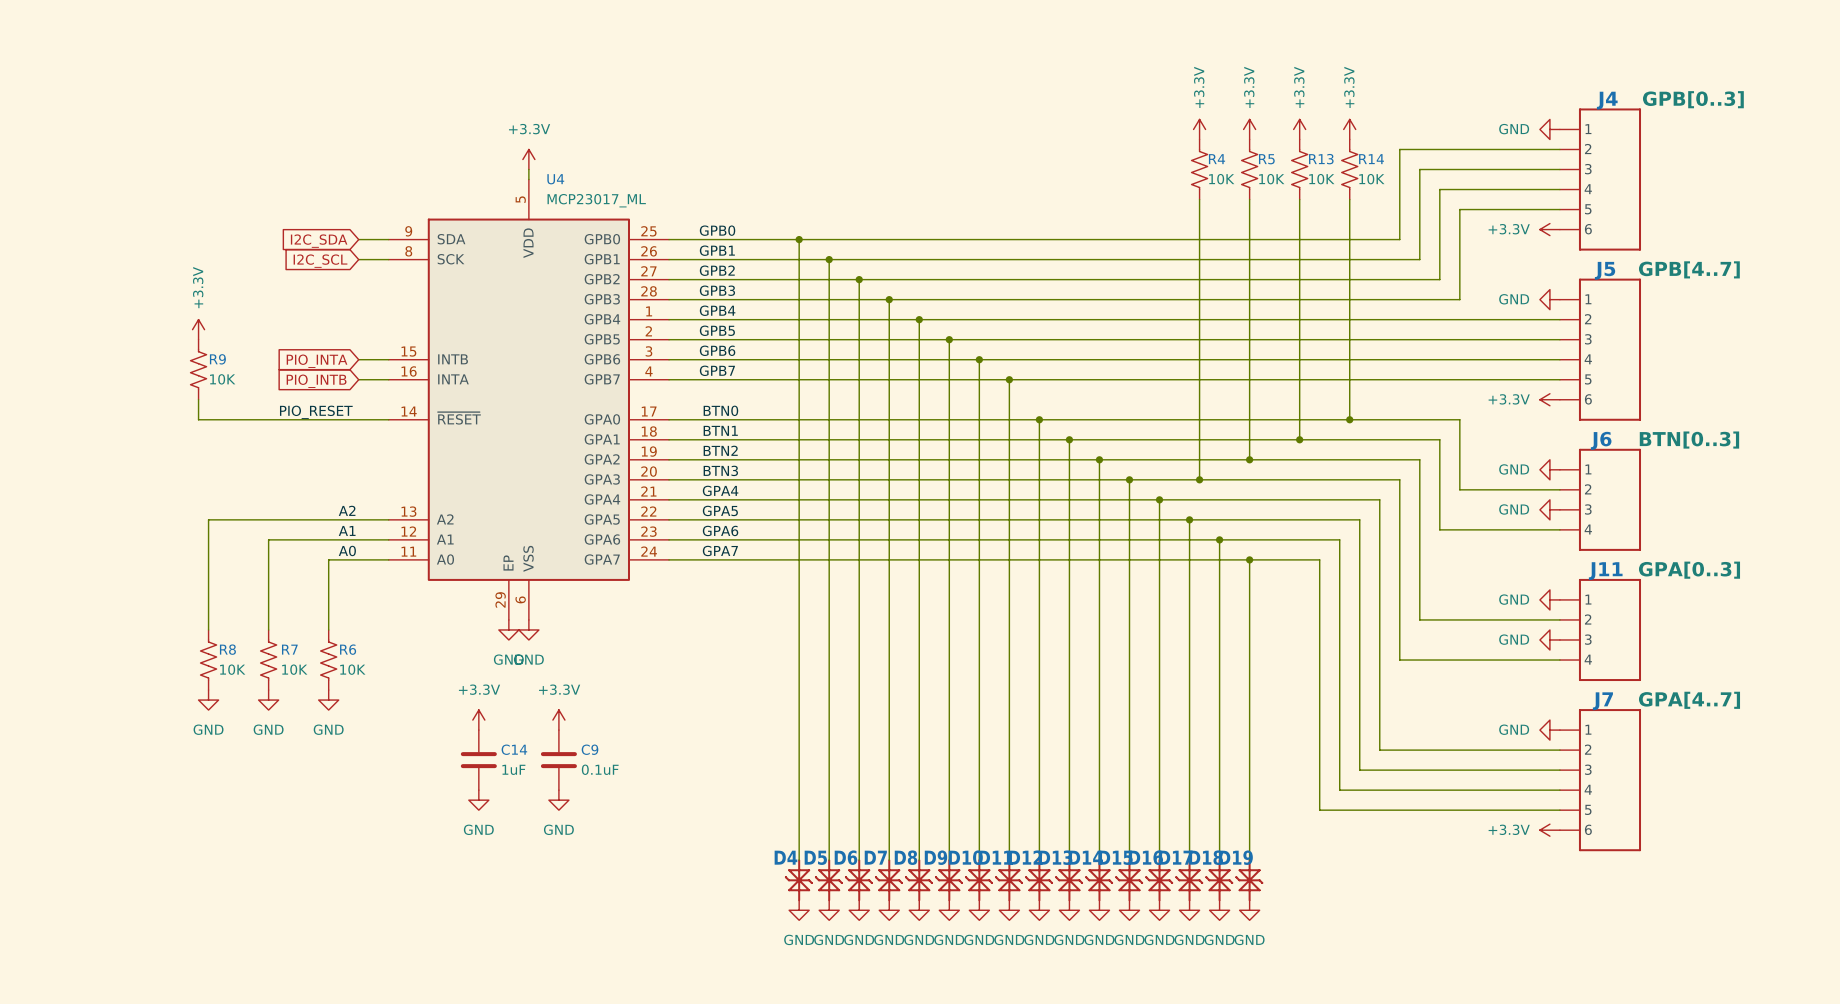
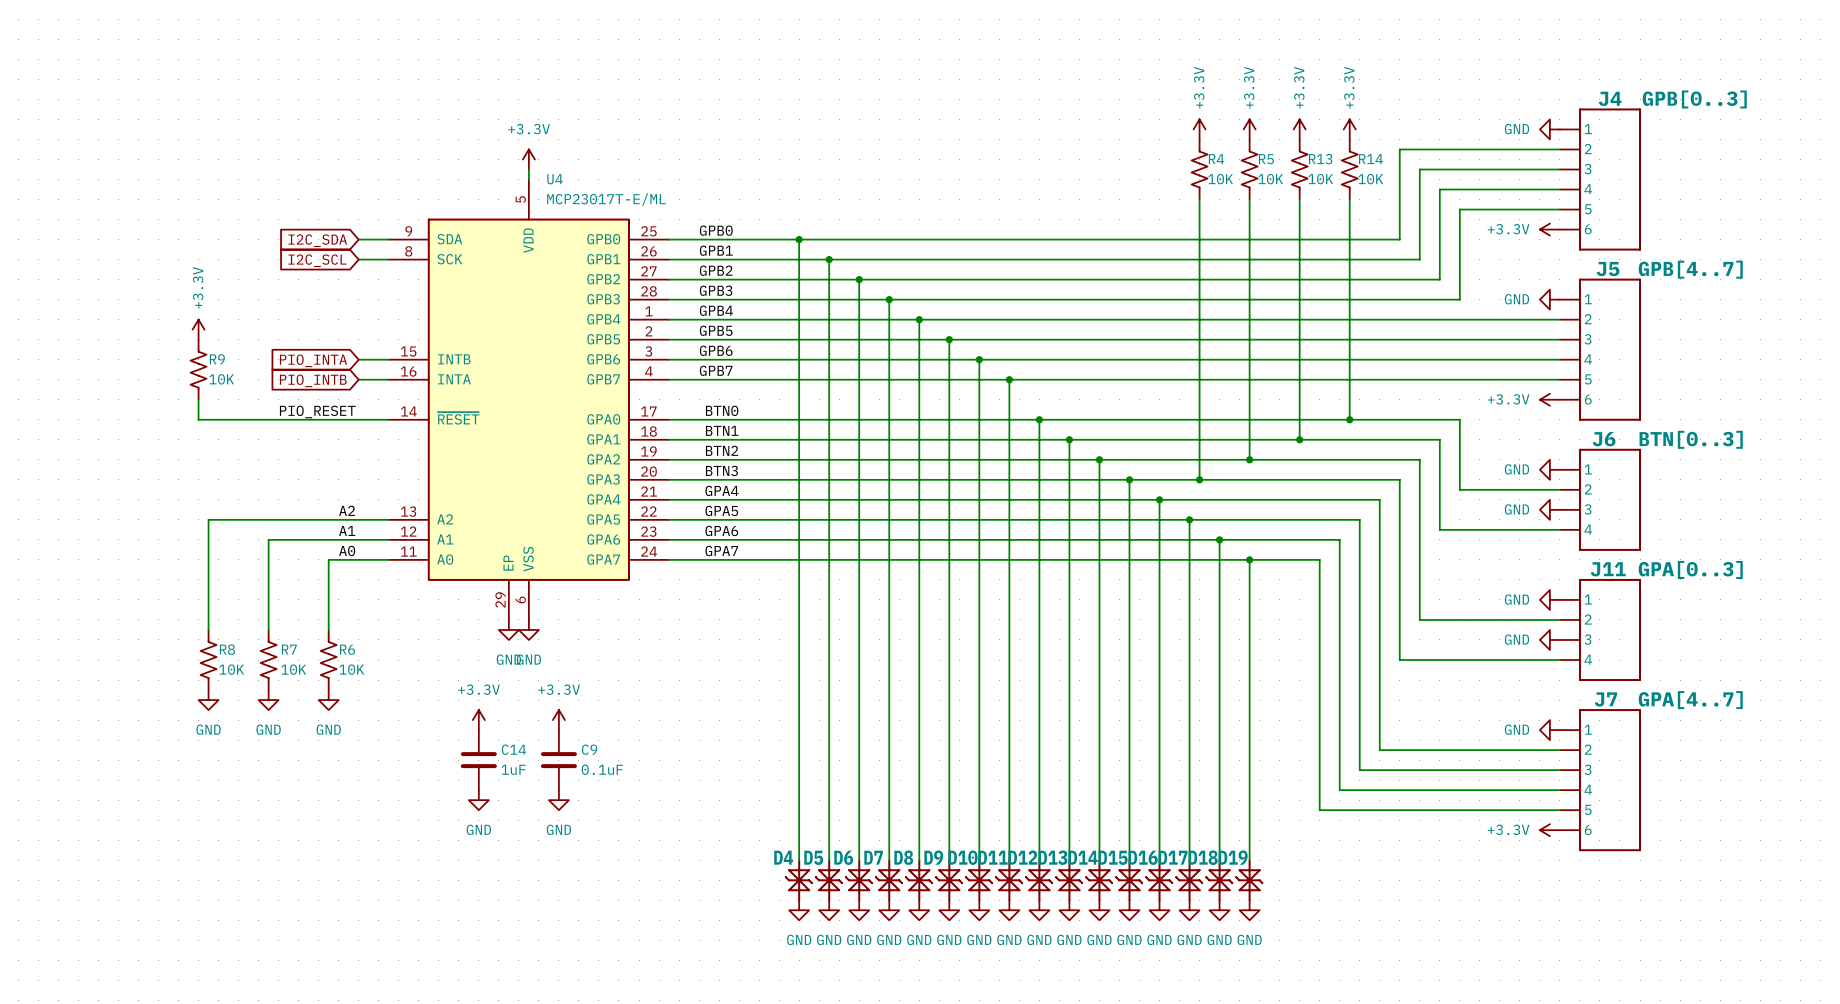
U4 value: MCP23017_ML (596, 200) -> MCP23017T-E/ML (606, 199)

